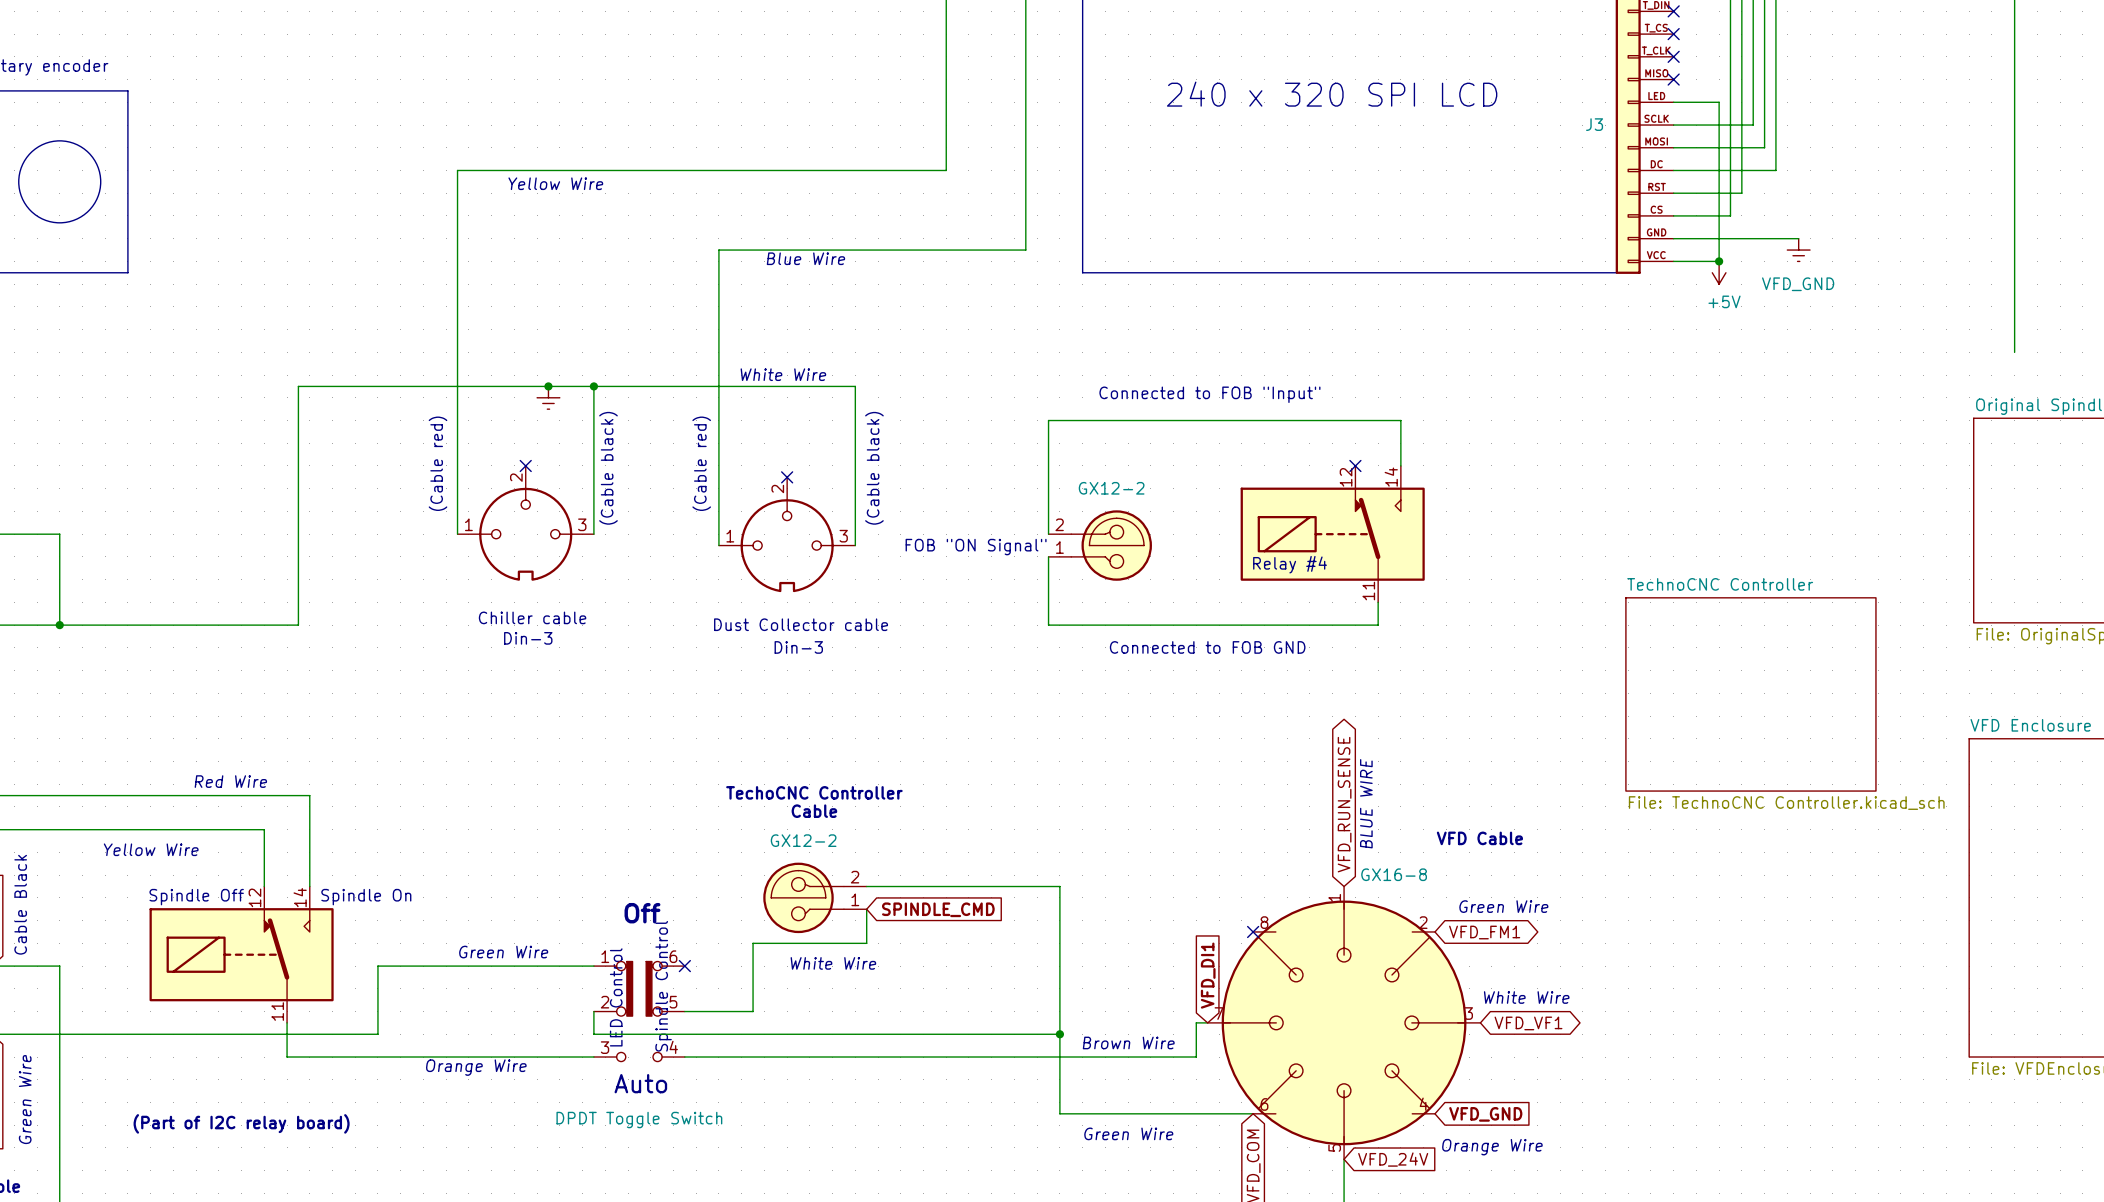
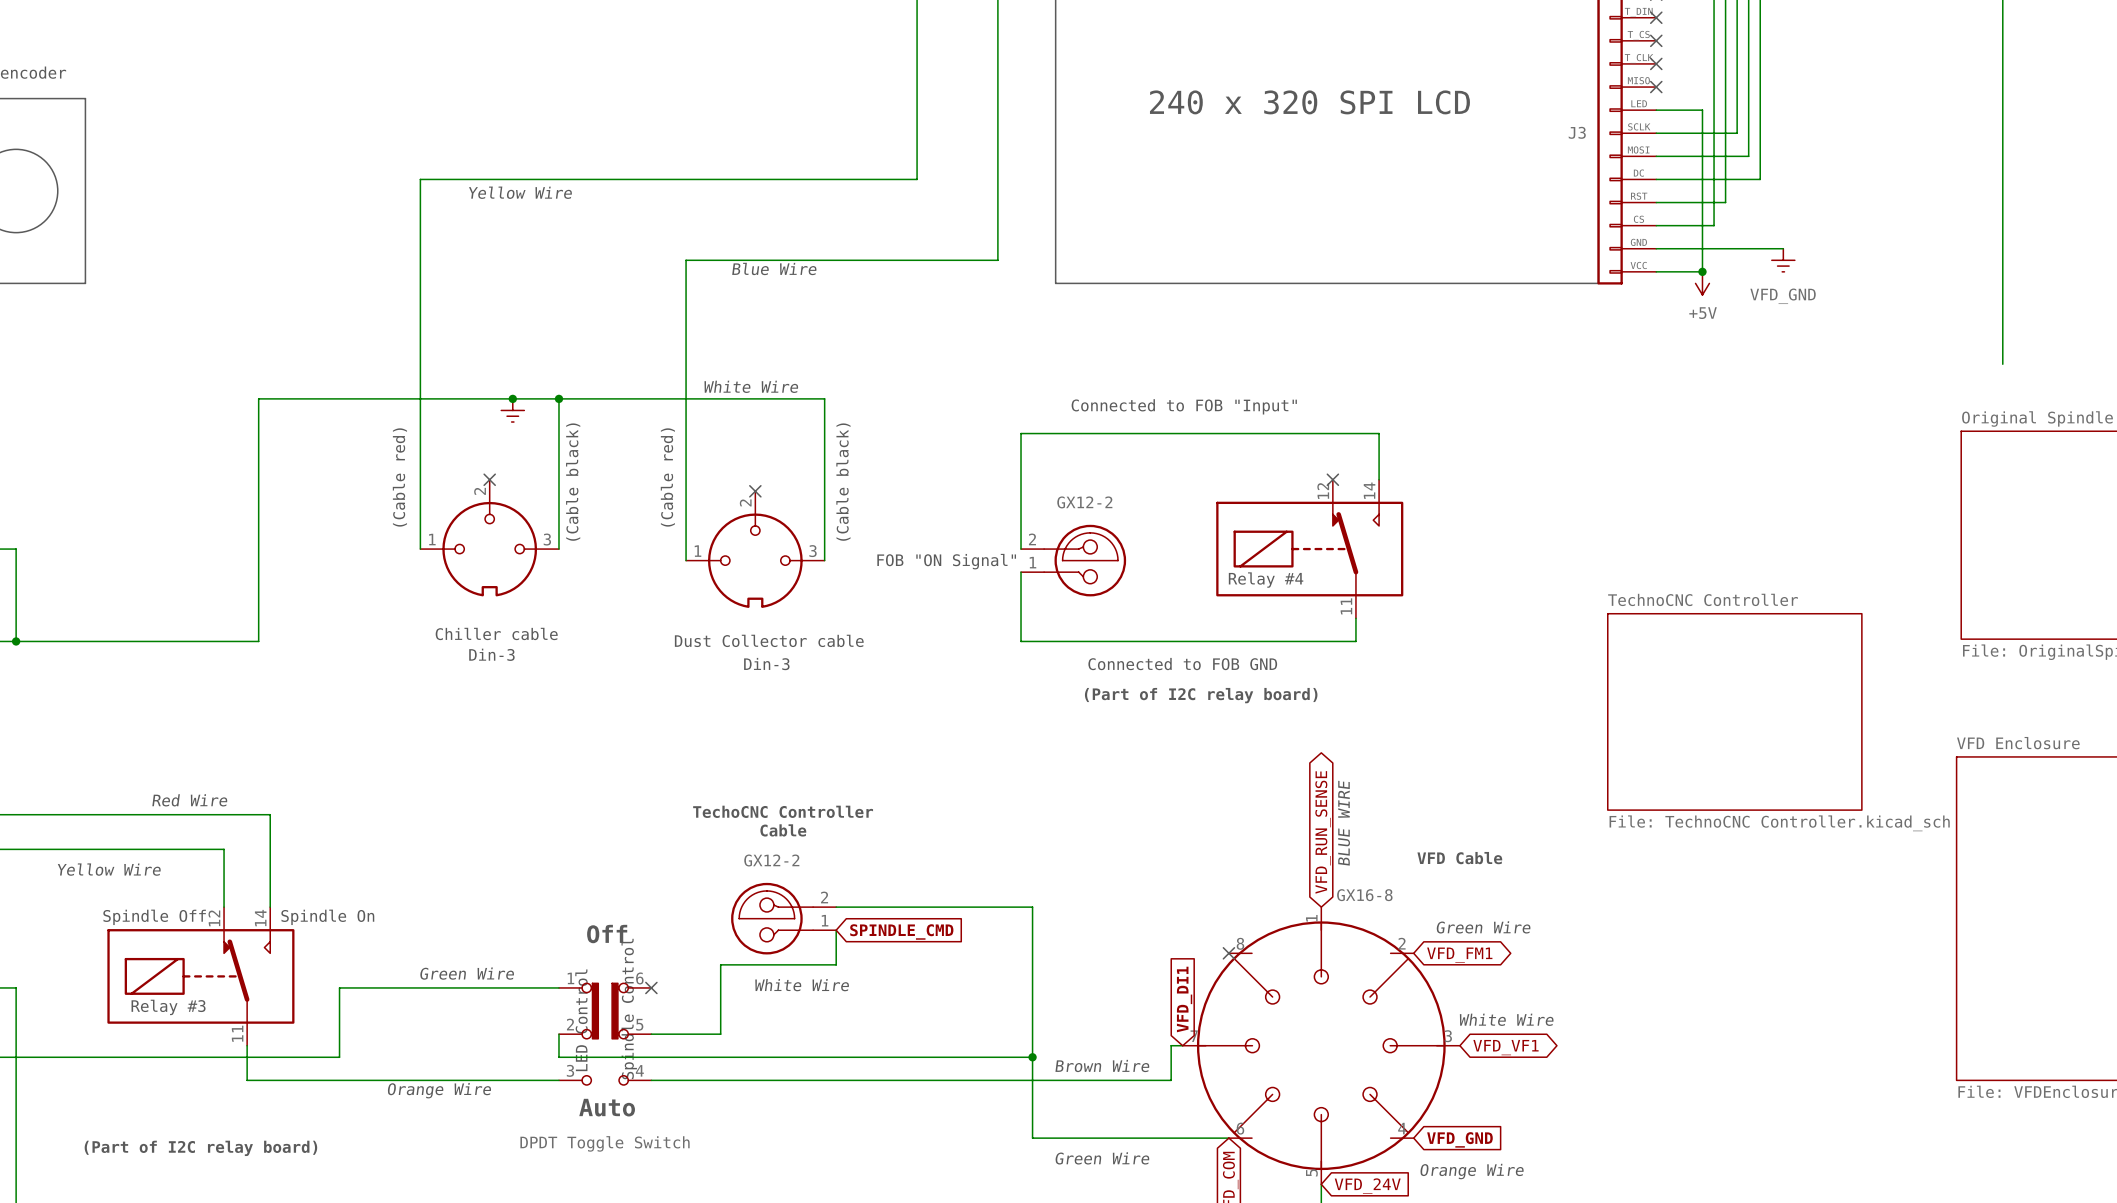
text: none -> (Part of I2C relay board) (1201, 695)
text: none -> Relay #3 (168, 1007)

